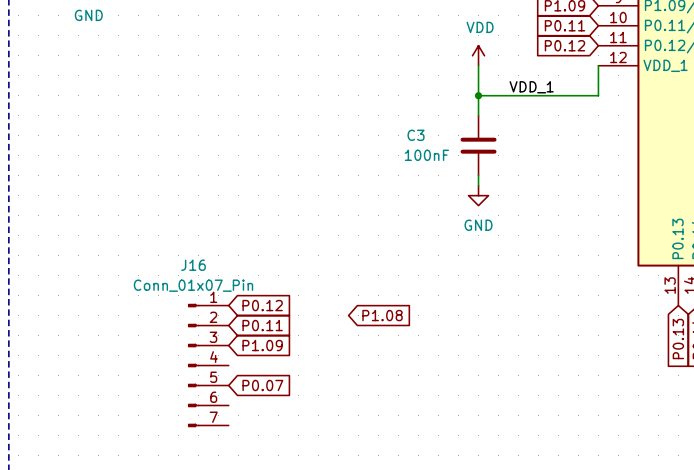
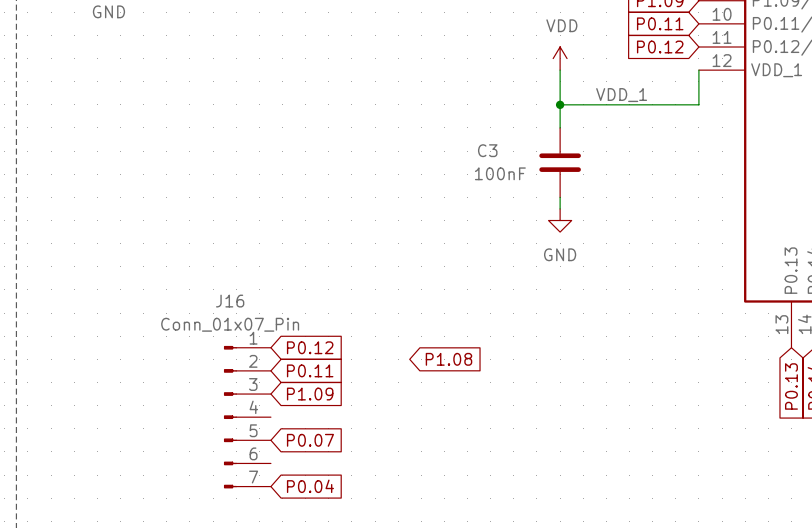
global label: none -> P0.04 (310, 486)

